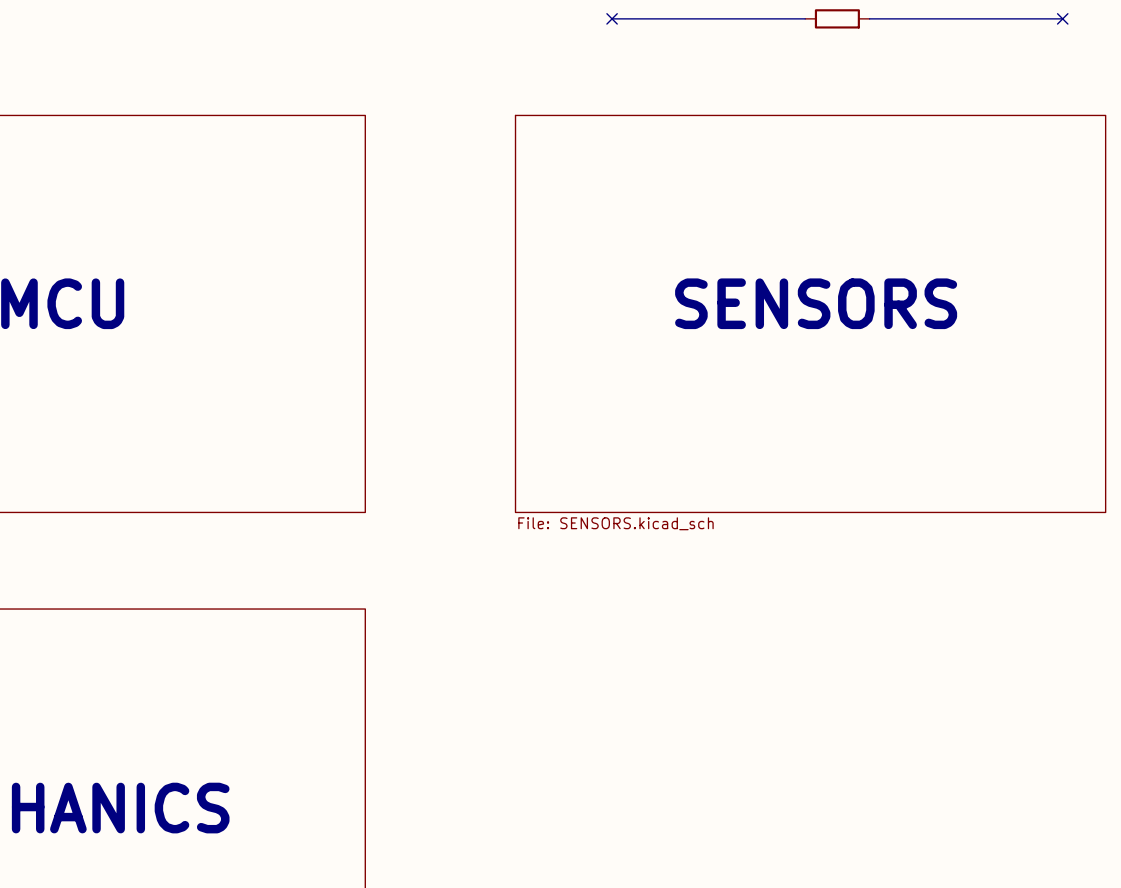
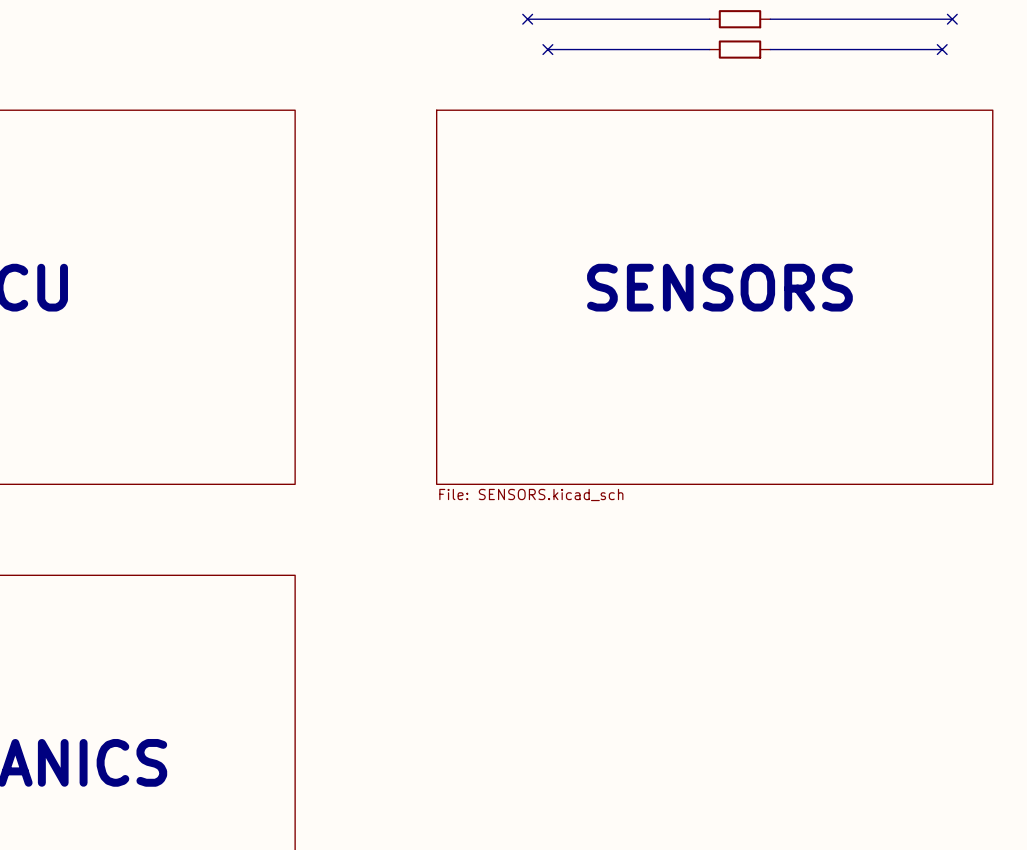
wire: none -> (547, 49) (709, 49)
no-connect mark: none -> (547, 49)
part: none -> (740, 49)
wire: none -> (770, 49) (942, 49)
no-connect mark: none -> (942, 49)

